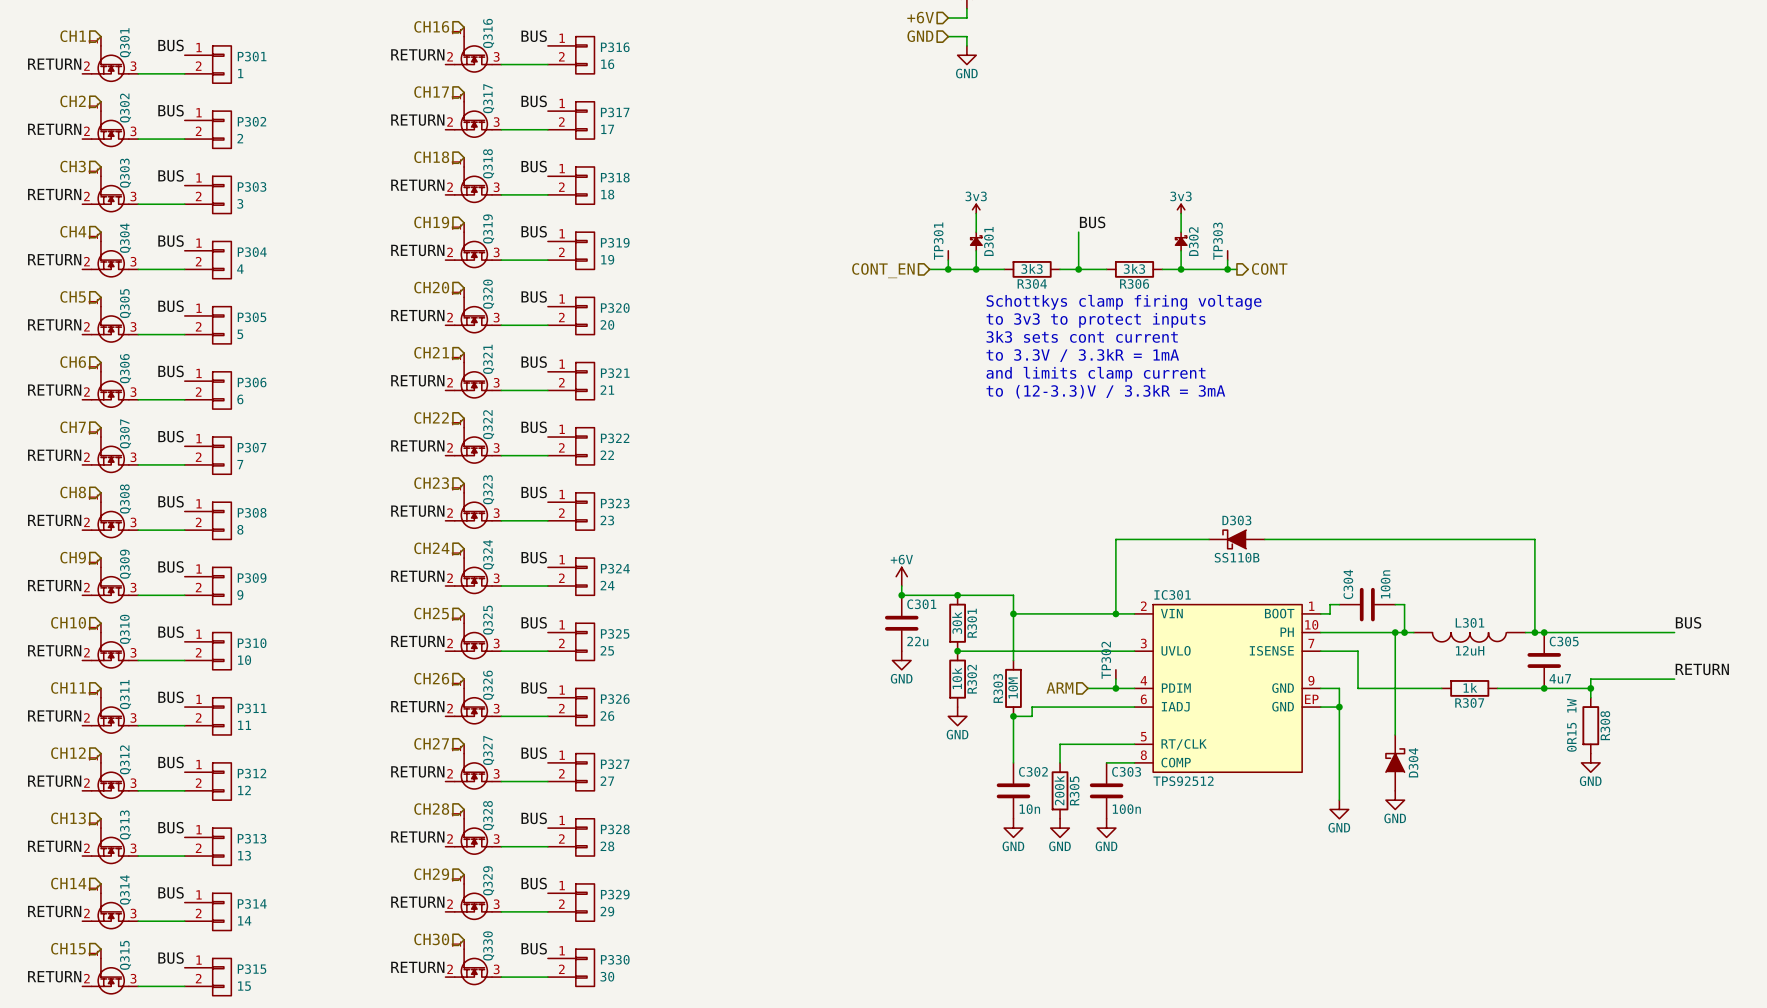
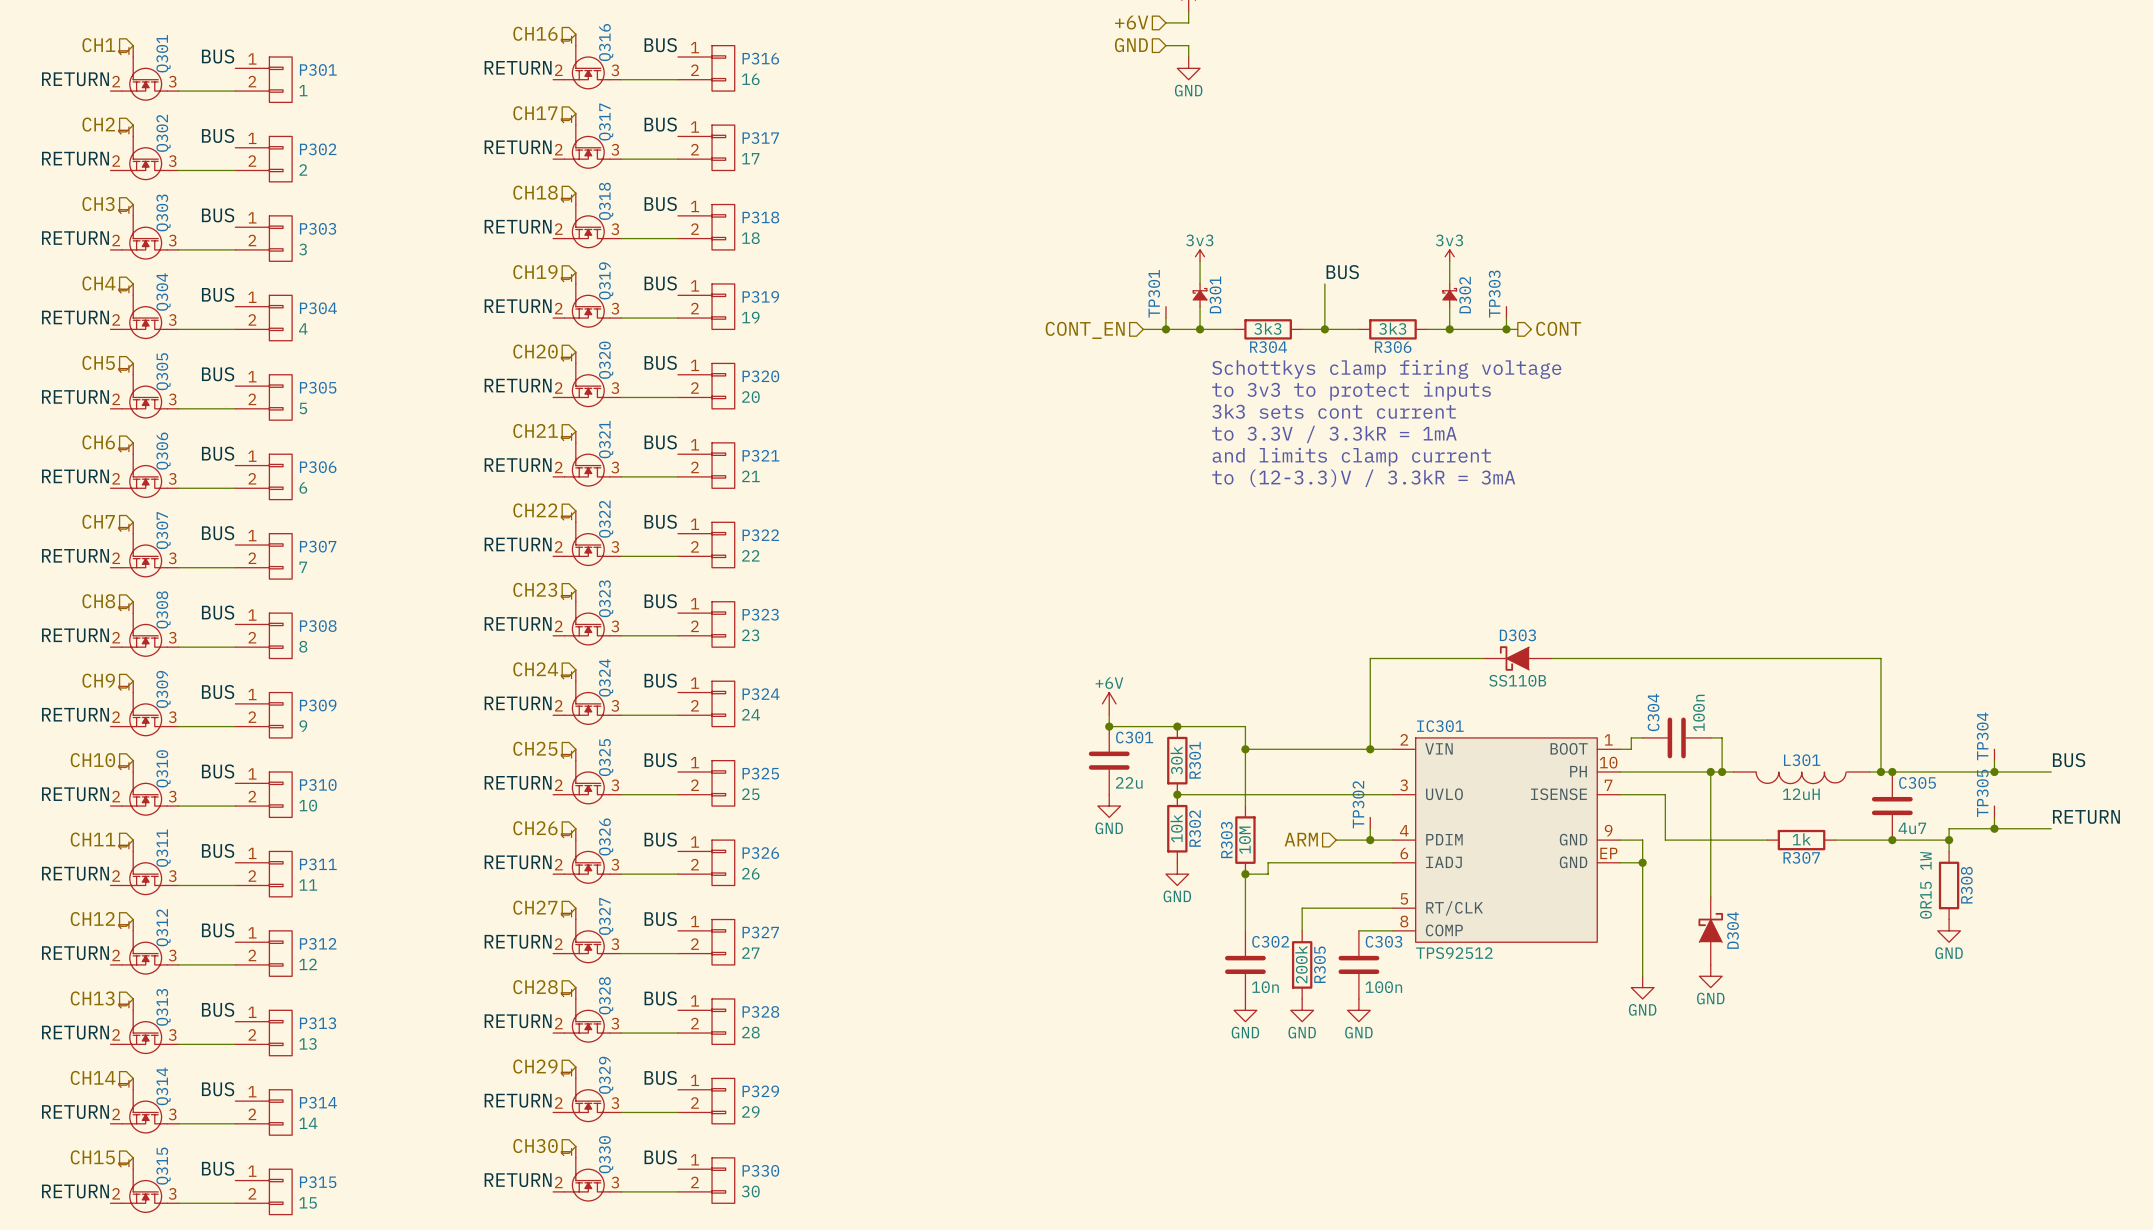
TP304: none -> (1994, 752)
wire: none -> (1994, 760) (1994, 771)
junction: none -> (1994, 771)
TP305: none -> (1994, 809)
wire: none -> (1994, 817) (1994, 828)
junction: none -> (1994, 828)

